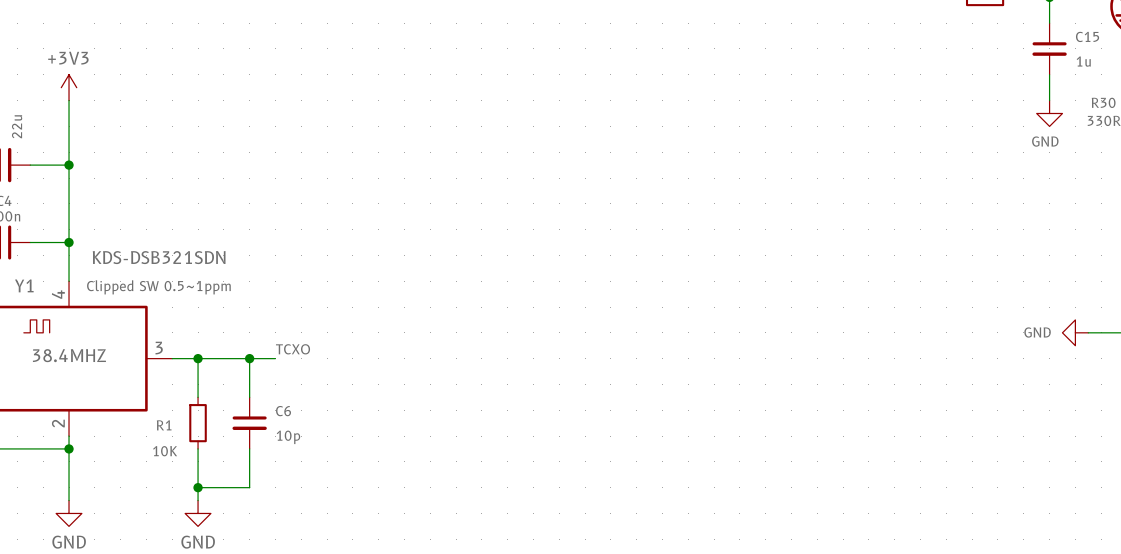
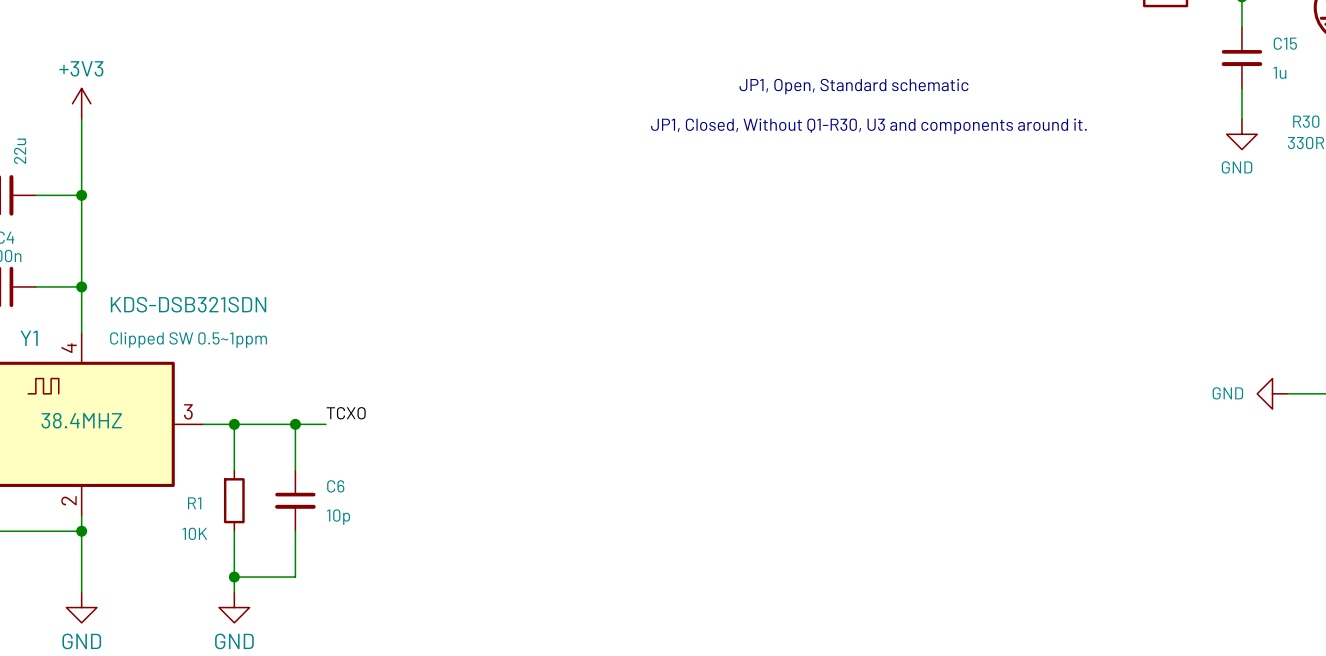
text: none -> JP1, Open, Standard schematic (854, 86)
text: none -> JP1, Closed, Without Q1-R30, U3 and components around it. (868, 126)

